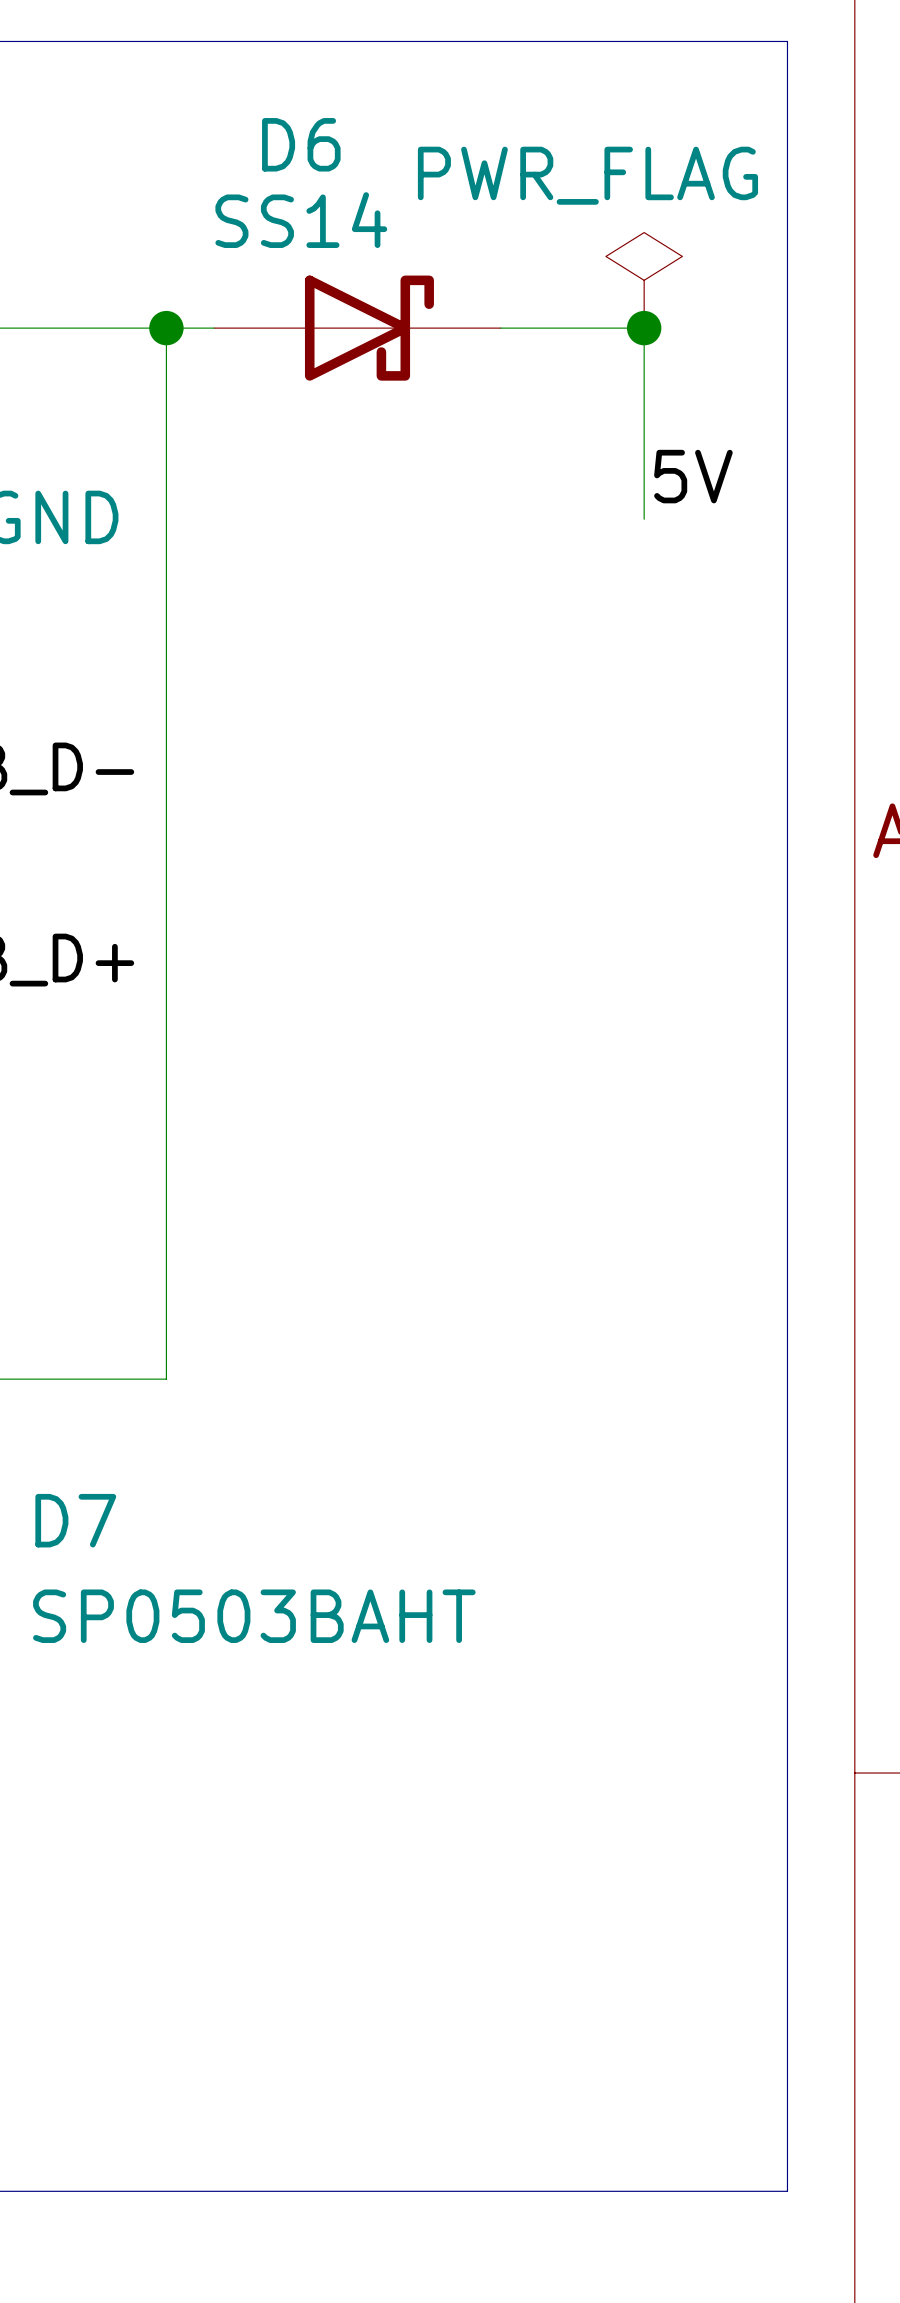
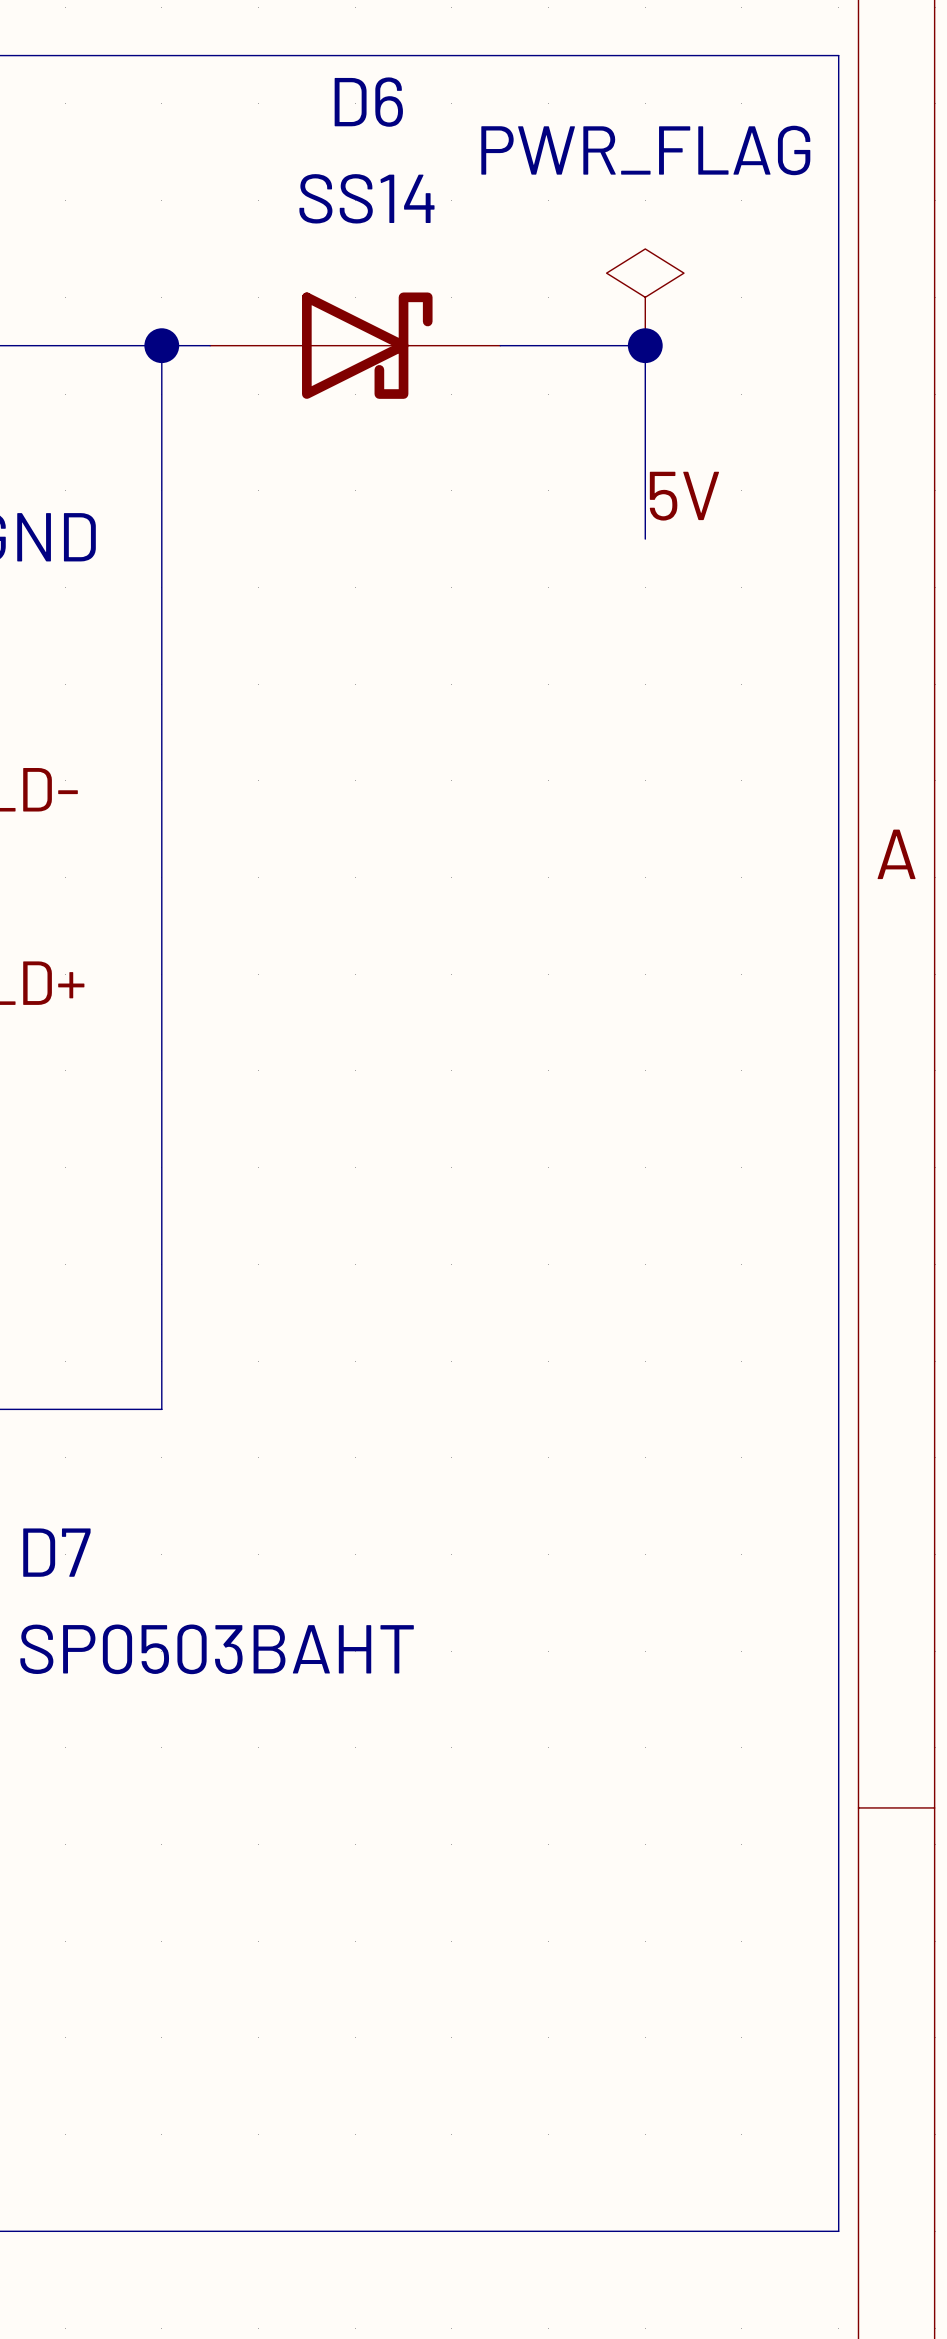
line: (787, 41) (787, 2191) -> (790, 55) (838, 55) (838, 2231) (790, 2231)
D6 name position: D6 (301, 144) -> D6 (368, 102)
power symbol text position: PWR_FLAG (587, 175) -> PWR_FLAG (645, 150)
D6 value position: SS14 (301, 220) -> SS14 (366, 198)

